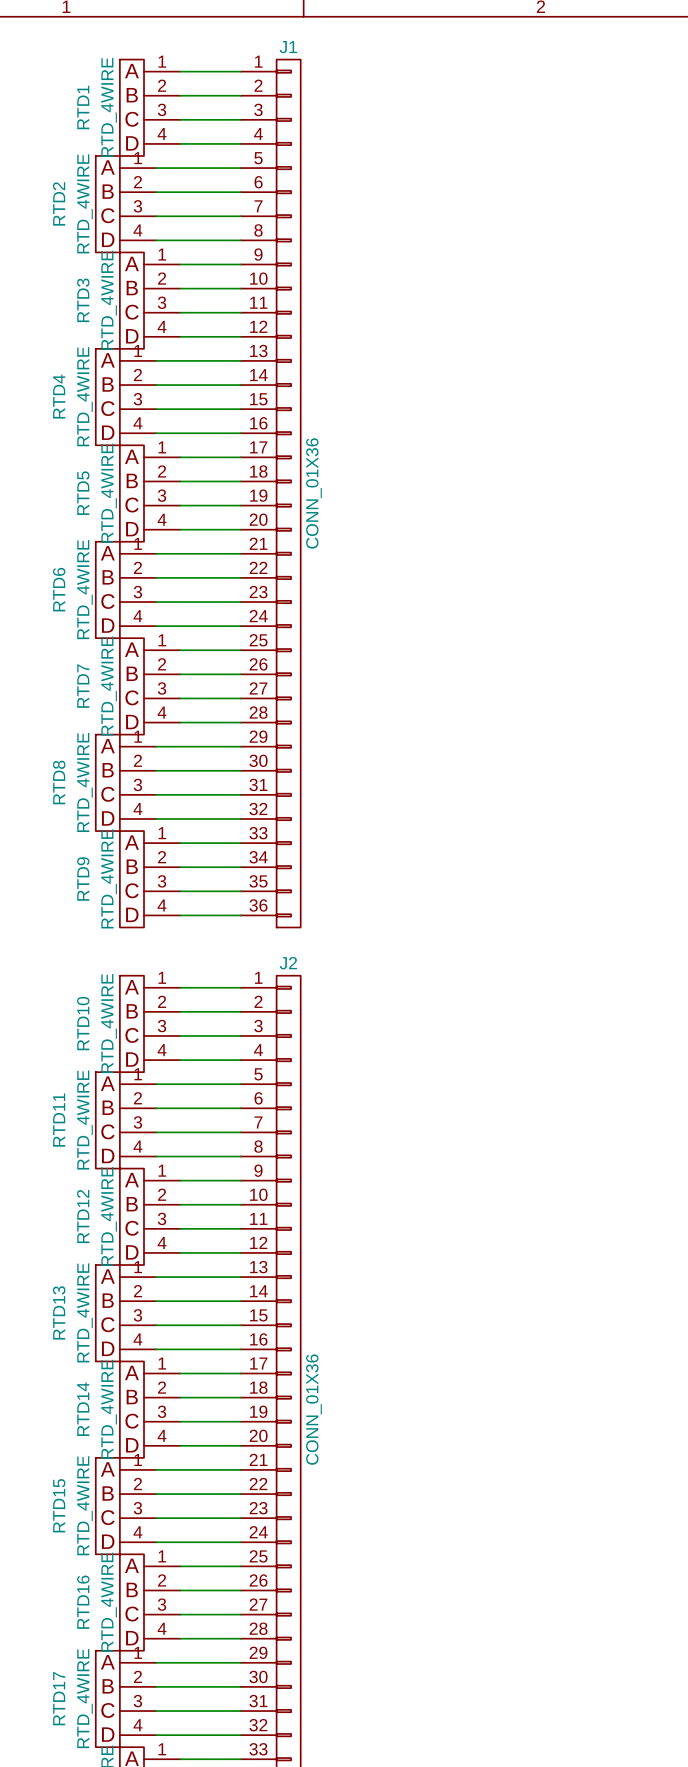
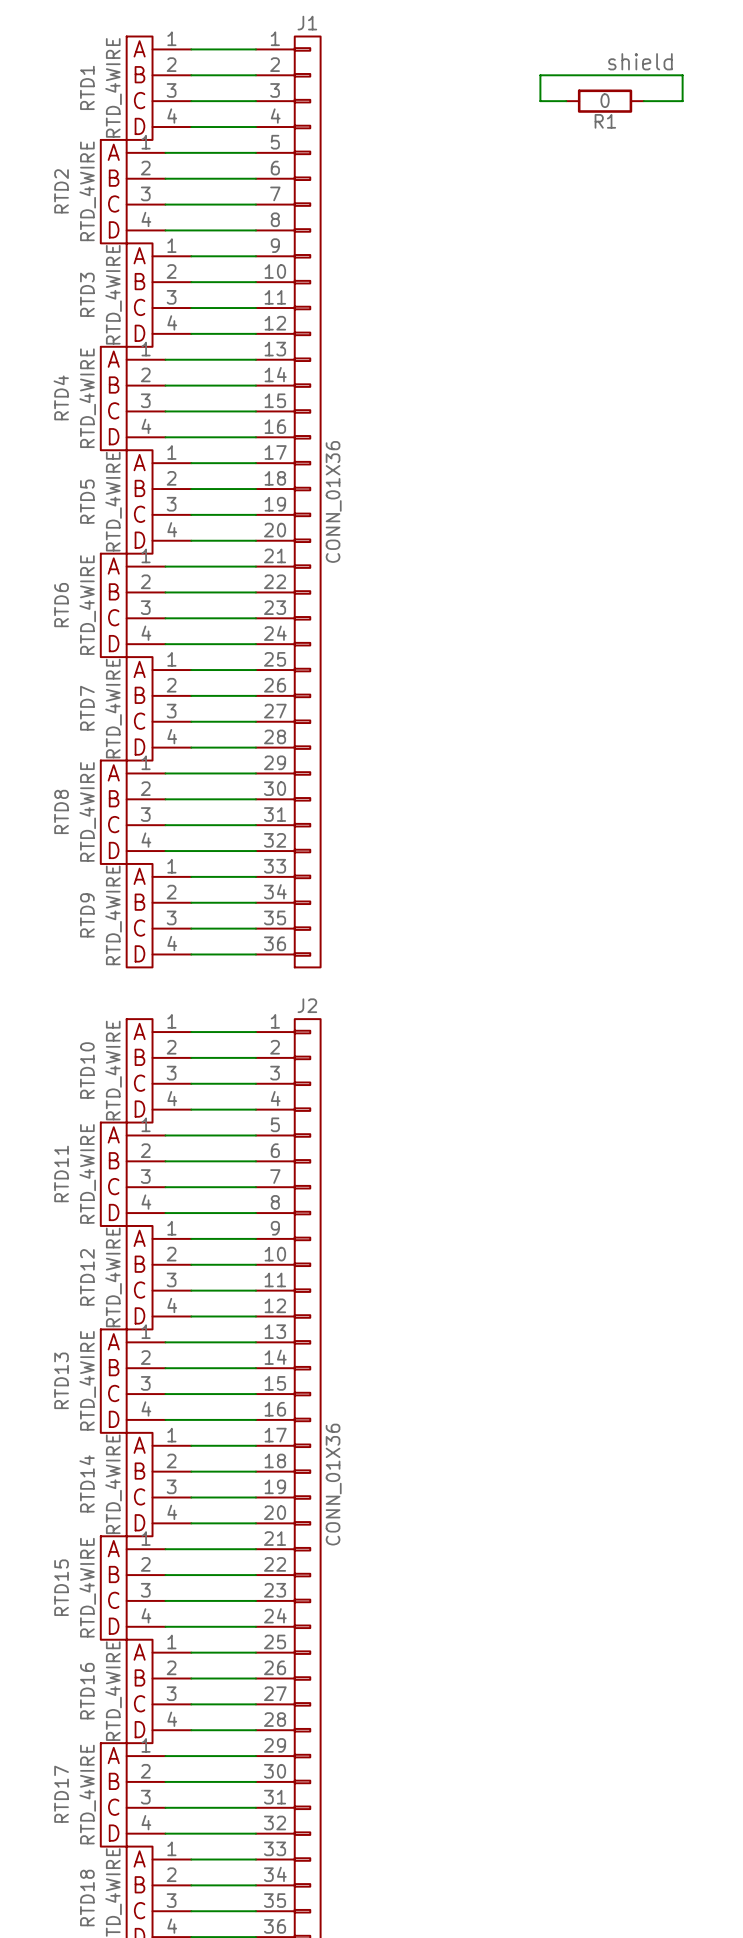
label: none -> shield (640, 61)
wire: none -> (566, 101) (540, 101) (540, 75) (682, 75) (682, 101) (643, 101)
R1: none -> 0 (605, 101)

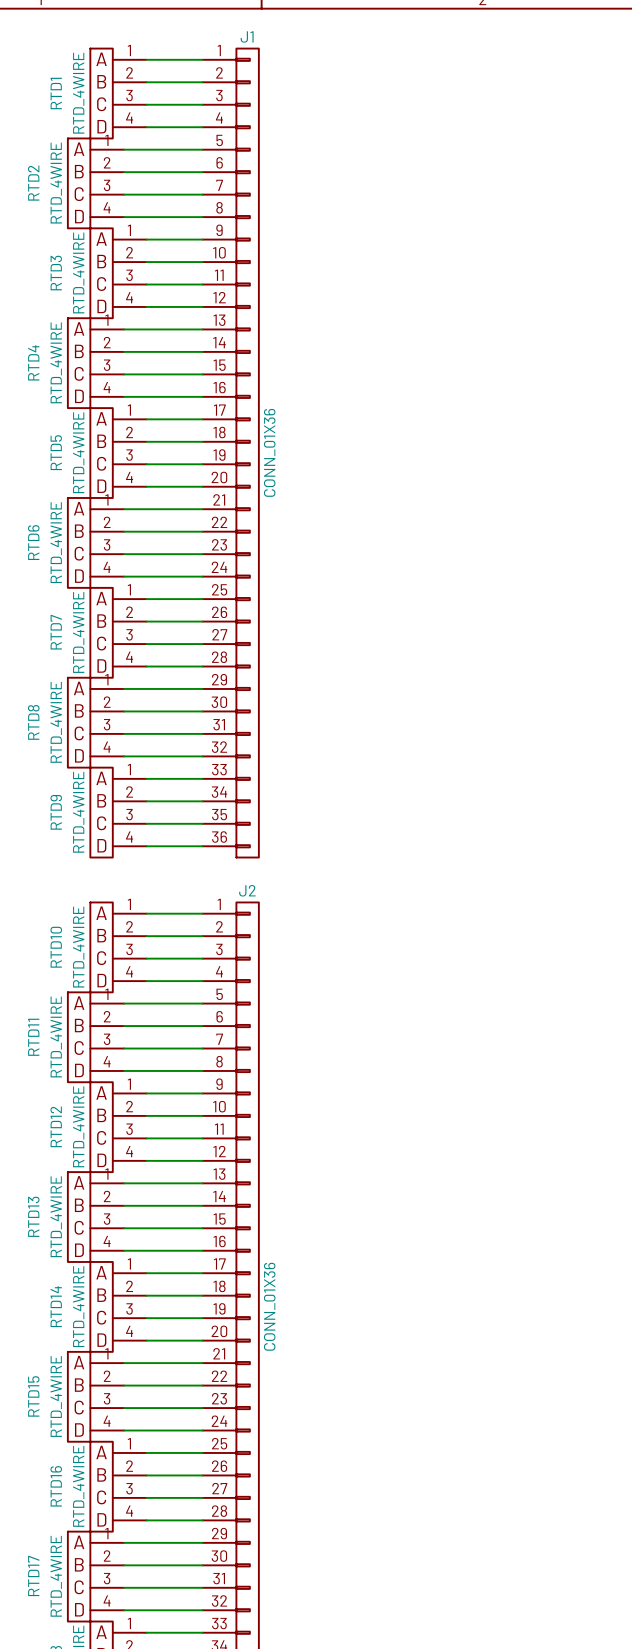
label: shield (640, 61) -> none
wire: (566, 101) (540, 101) (540, 75) (682, 75) (682, 101) (643, 101) -> none
R1: 0 (605, 101) -> none

